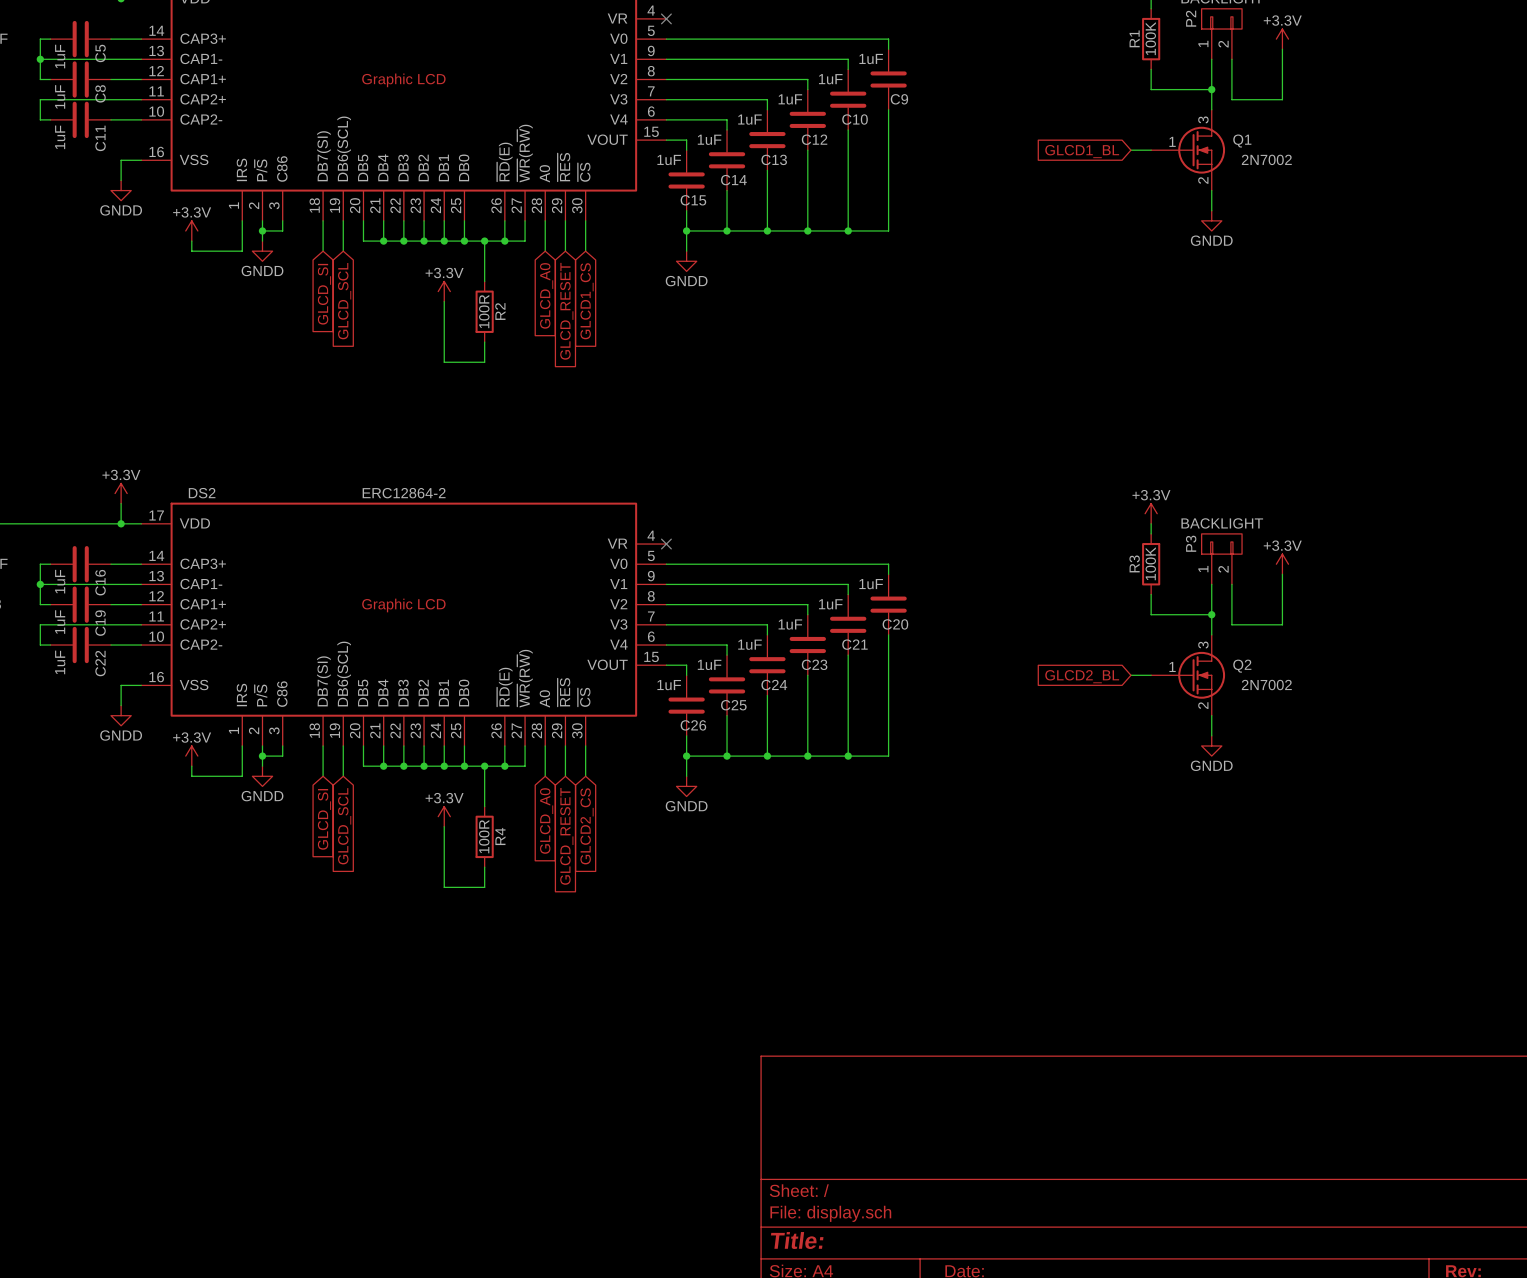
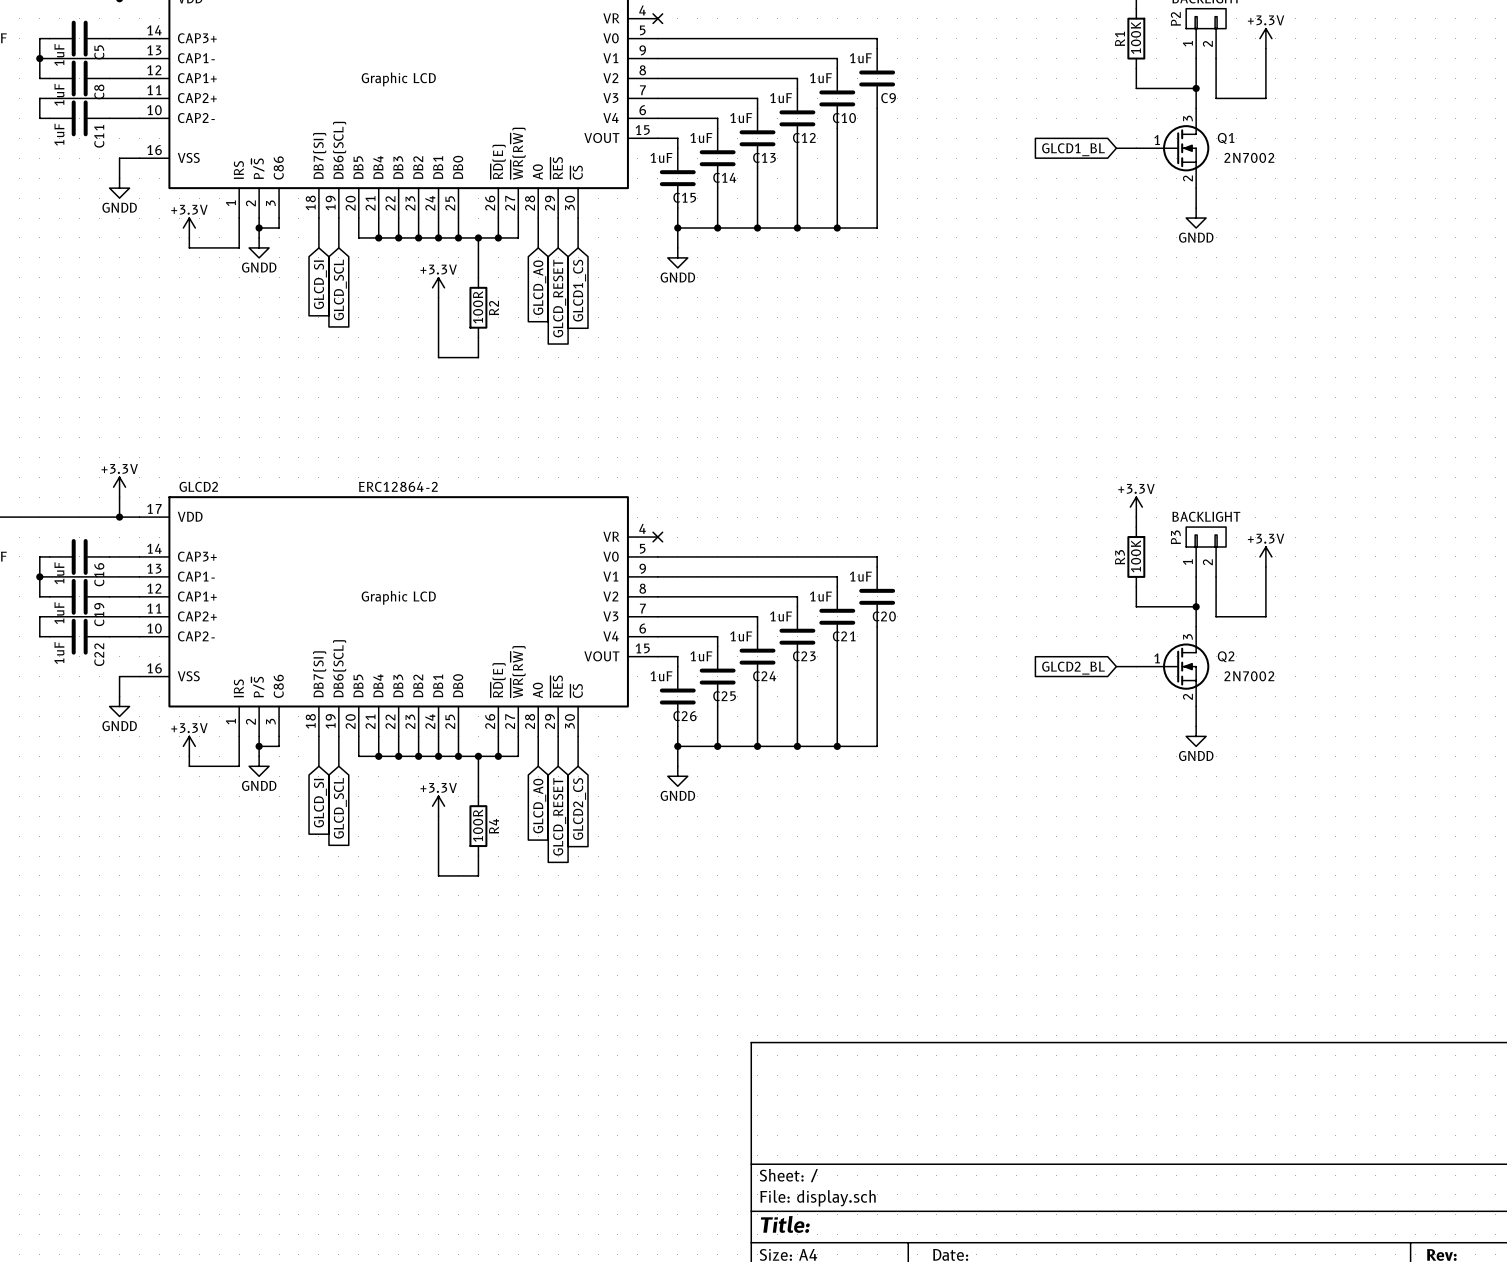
DS2 name: DS2 (202, 493) -> GLCD2 (198, 486)

